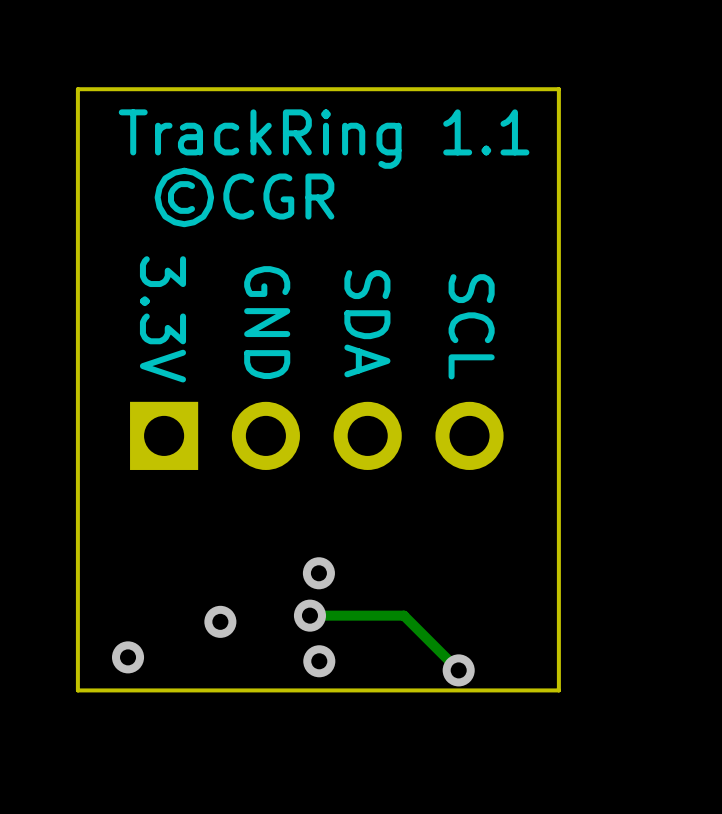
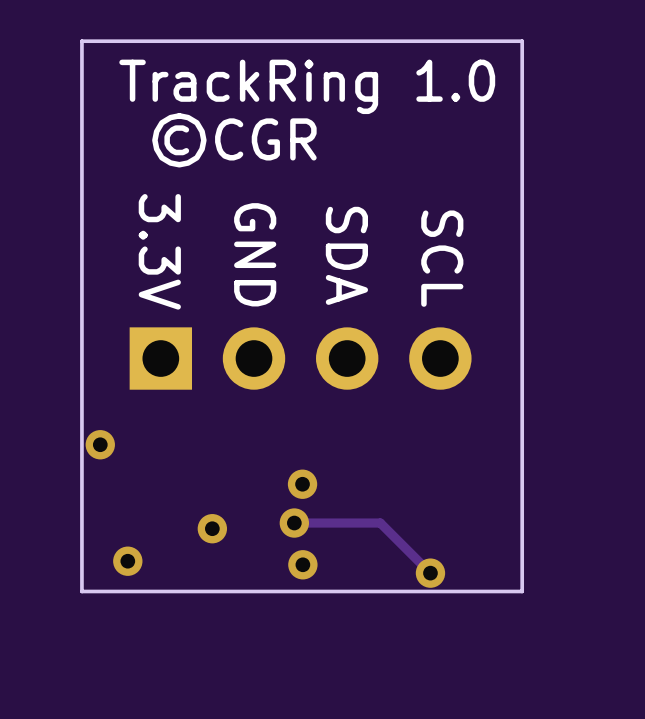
text: TrackRing 1.1 (324, 139) -> TrackRing 1.0 (307, 86)
via: none -> (100, 444)

